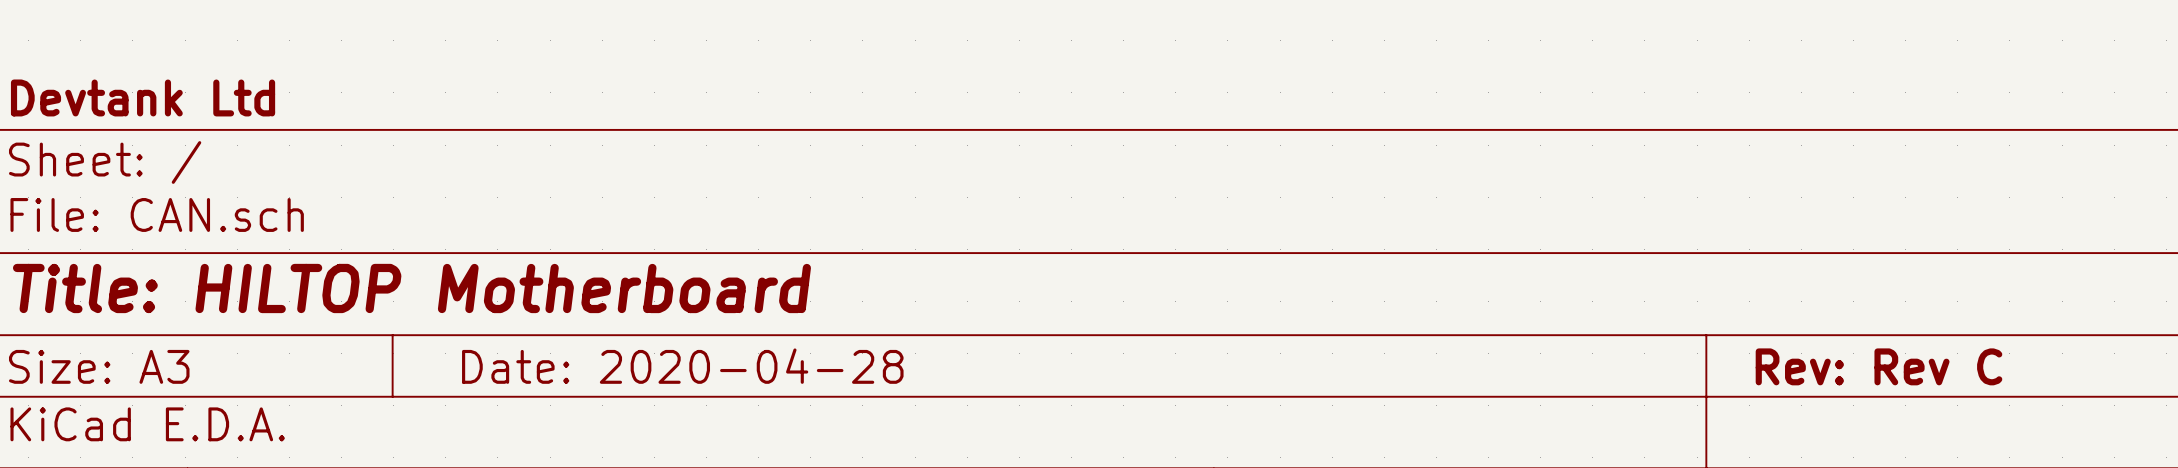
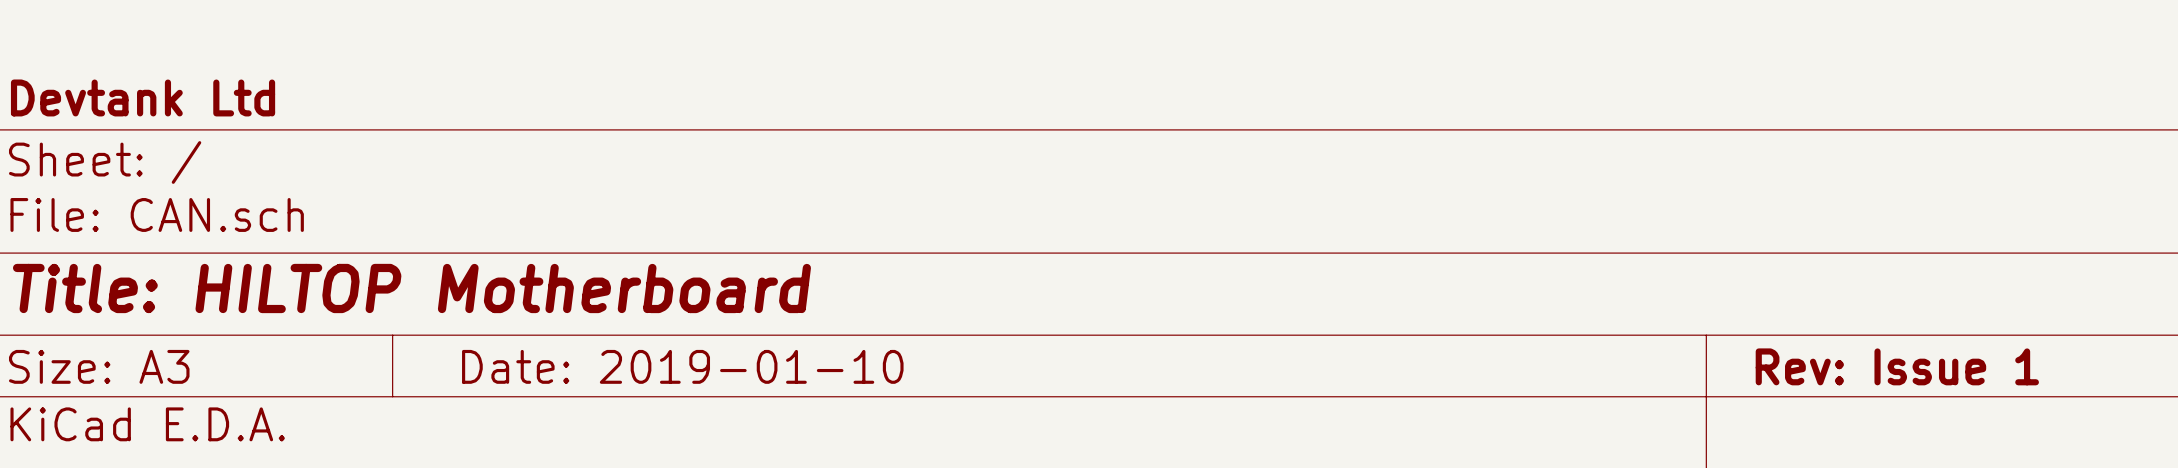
title block: Date: 2020-04-28 (682, 366) -> Date: 2019-01-10 (682, 366)
title block: Rev: Rev C (1878, 366) -> Rev: Issue 1 (1897, 366)

